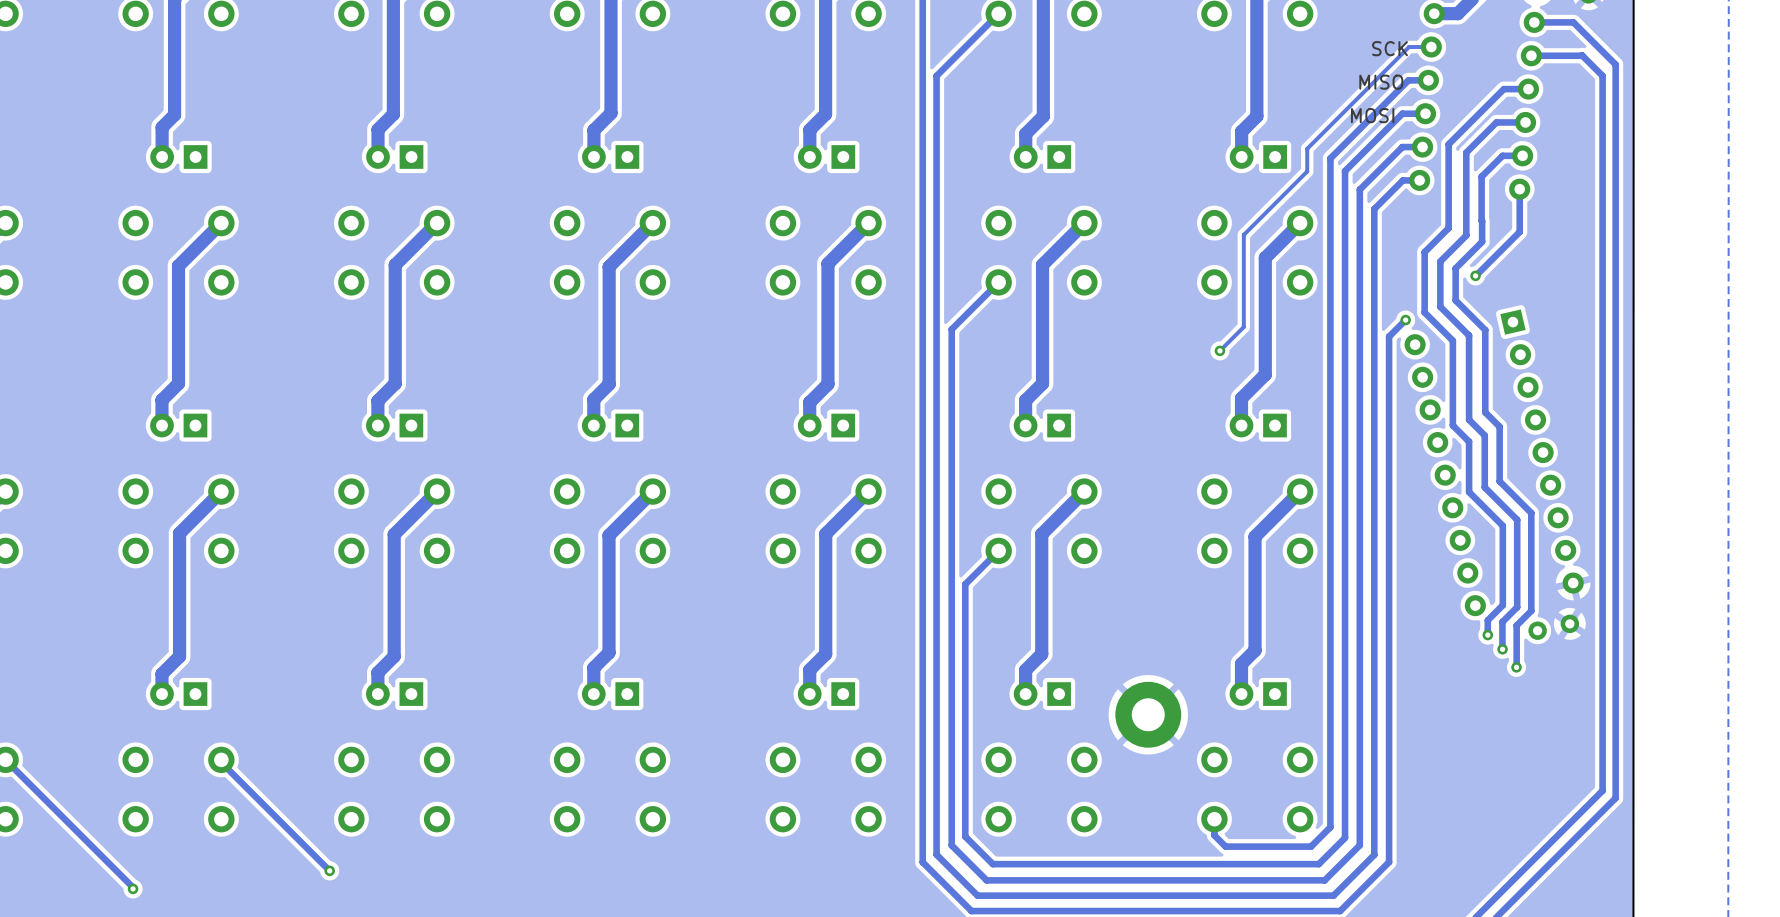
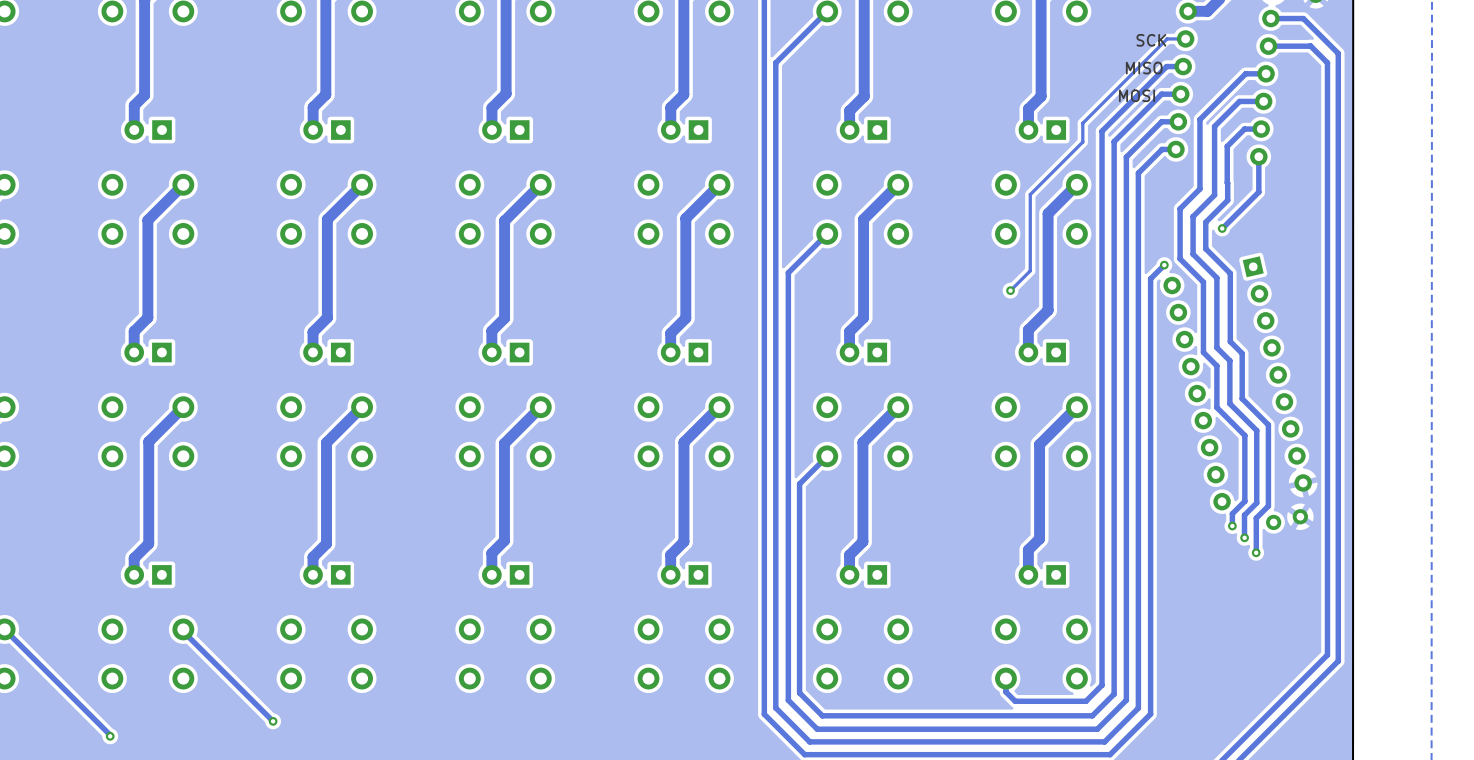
part: (1148, 714) -> none

